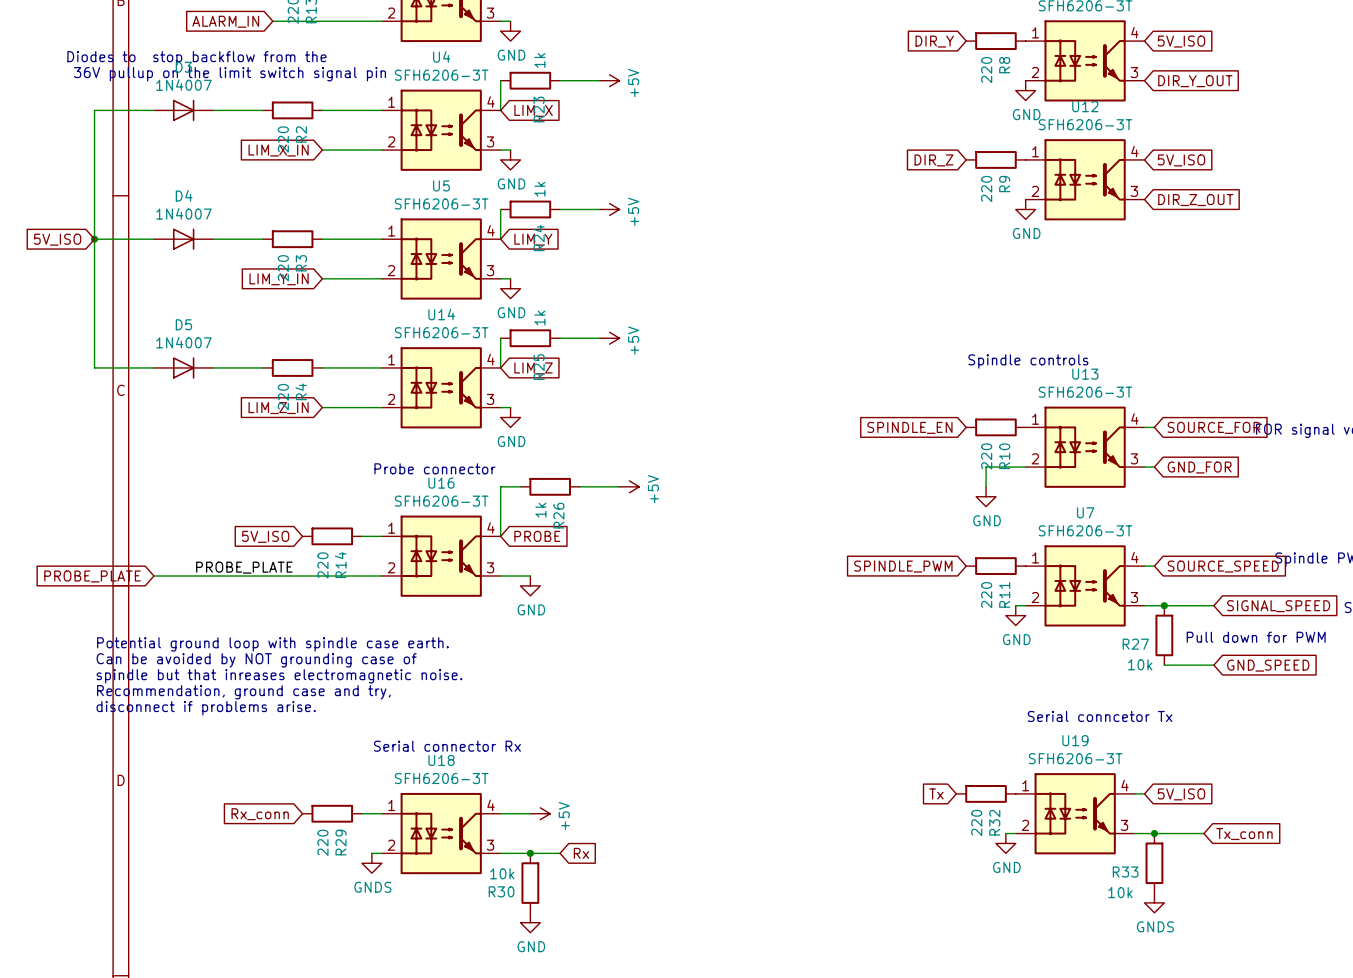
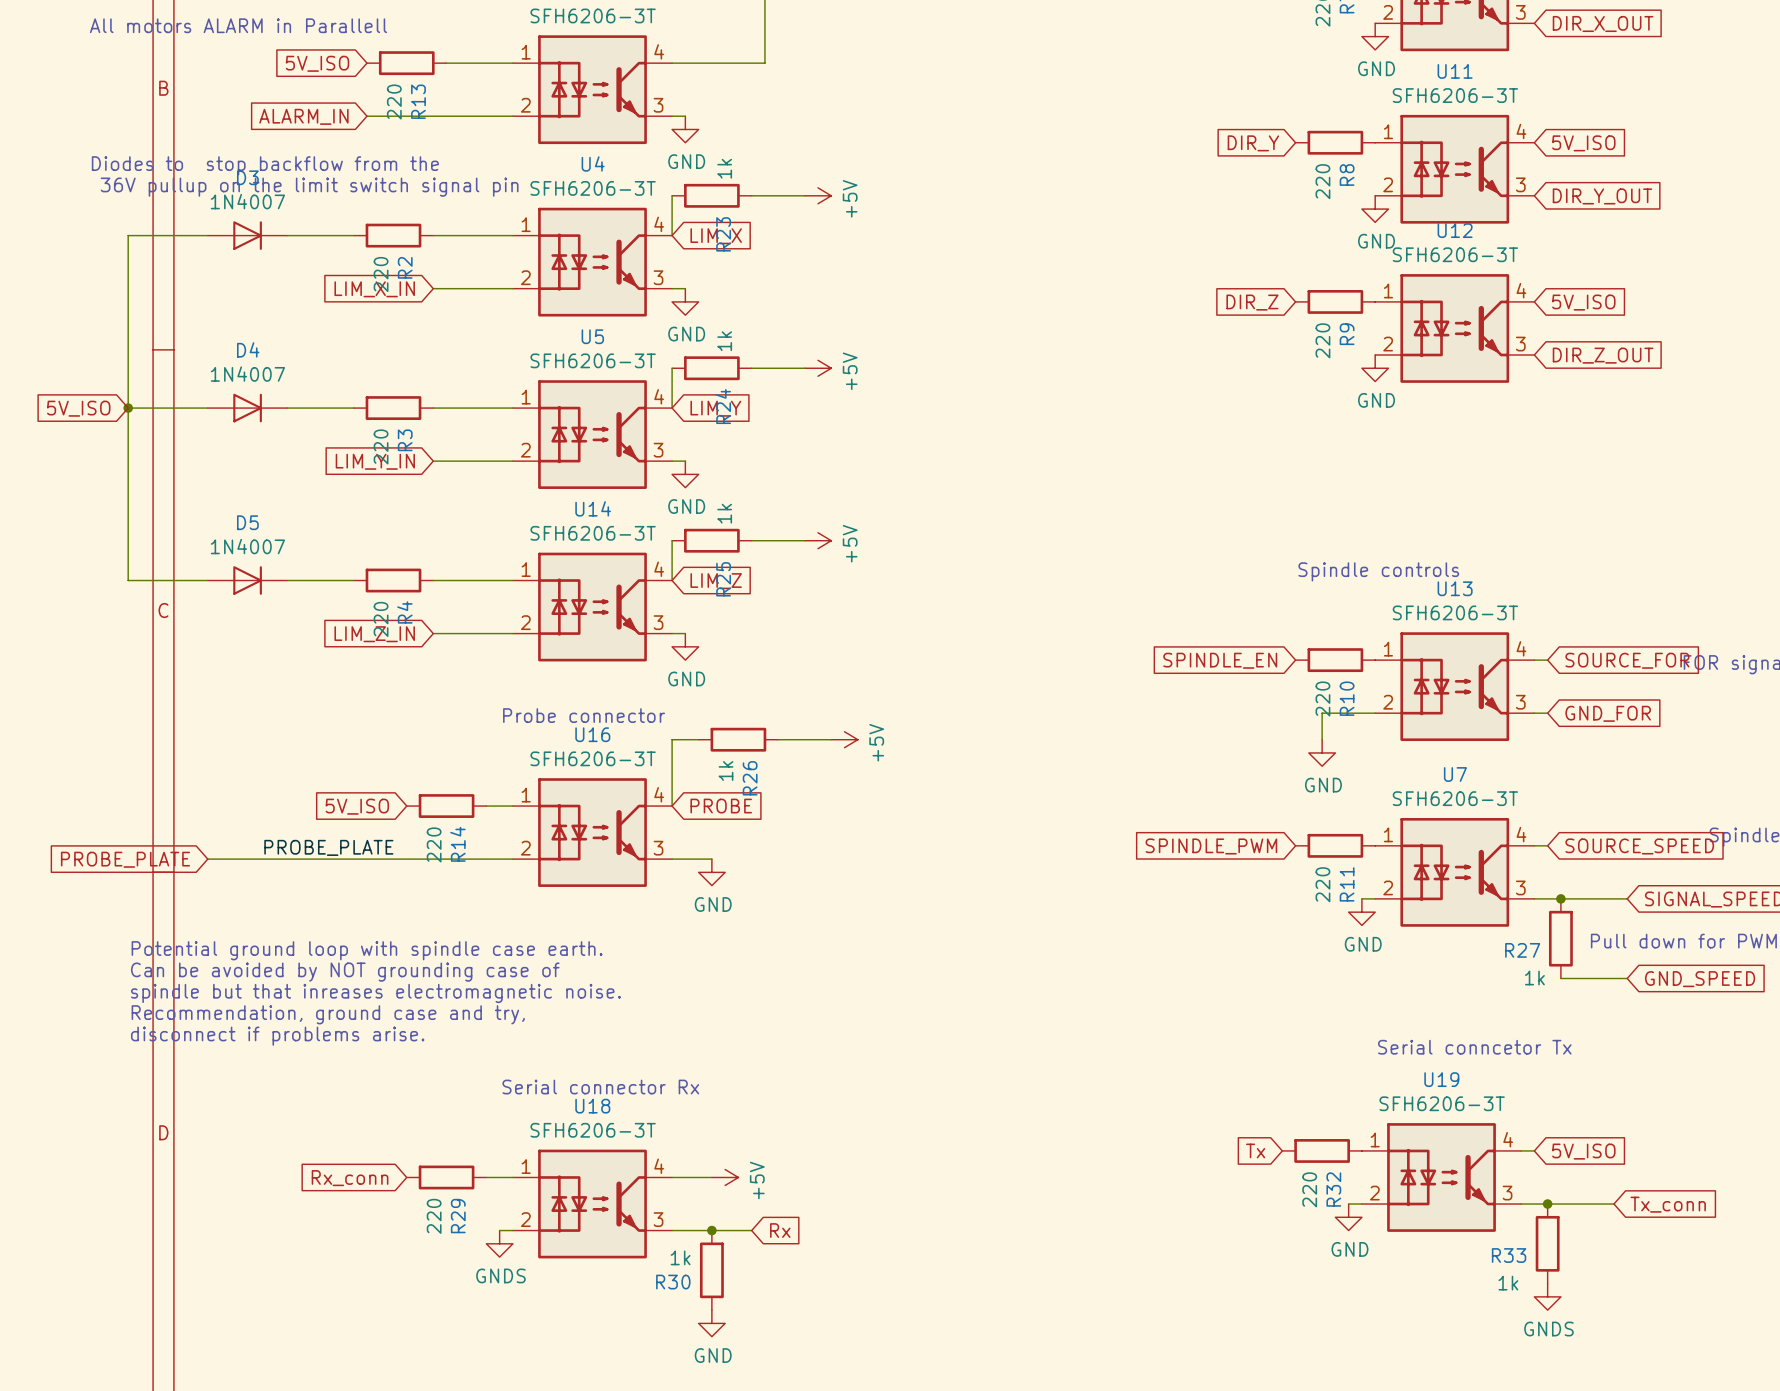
R27 value: 10k (1140, 664) -> 1k (1534, 978)
R30 value: 10k (502, 873) -> 1k (680, 1257)
R33 value: 10k (1120, 892) -> 1k (1508, 1283)

